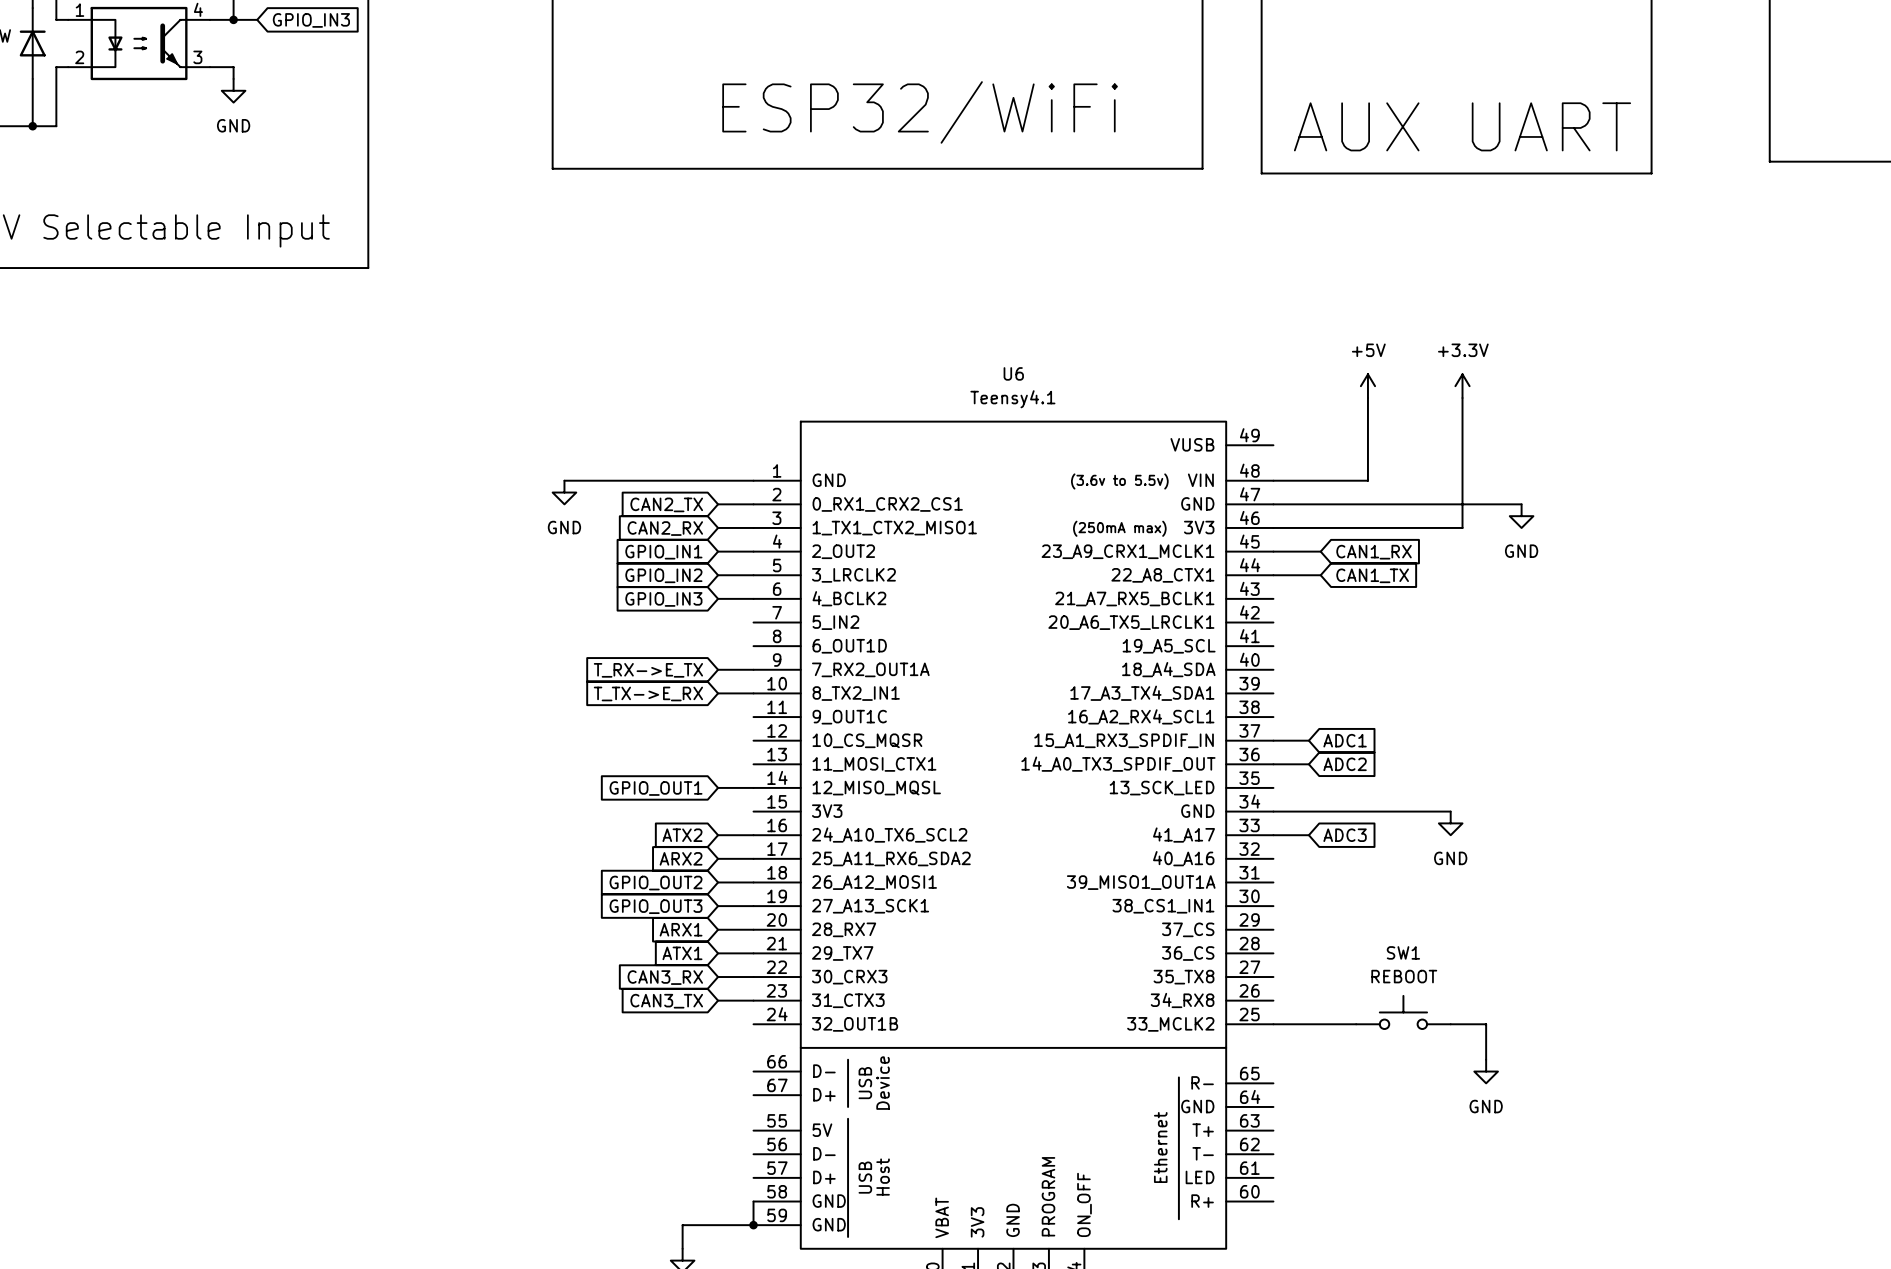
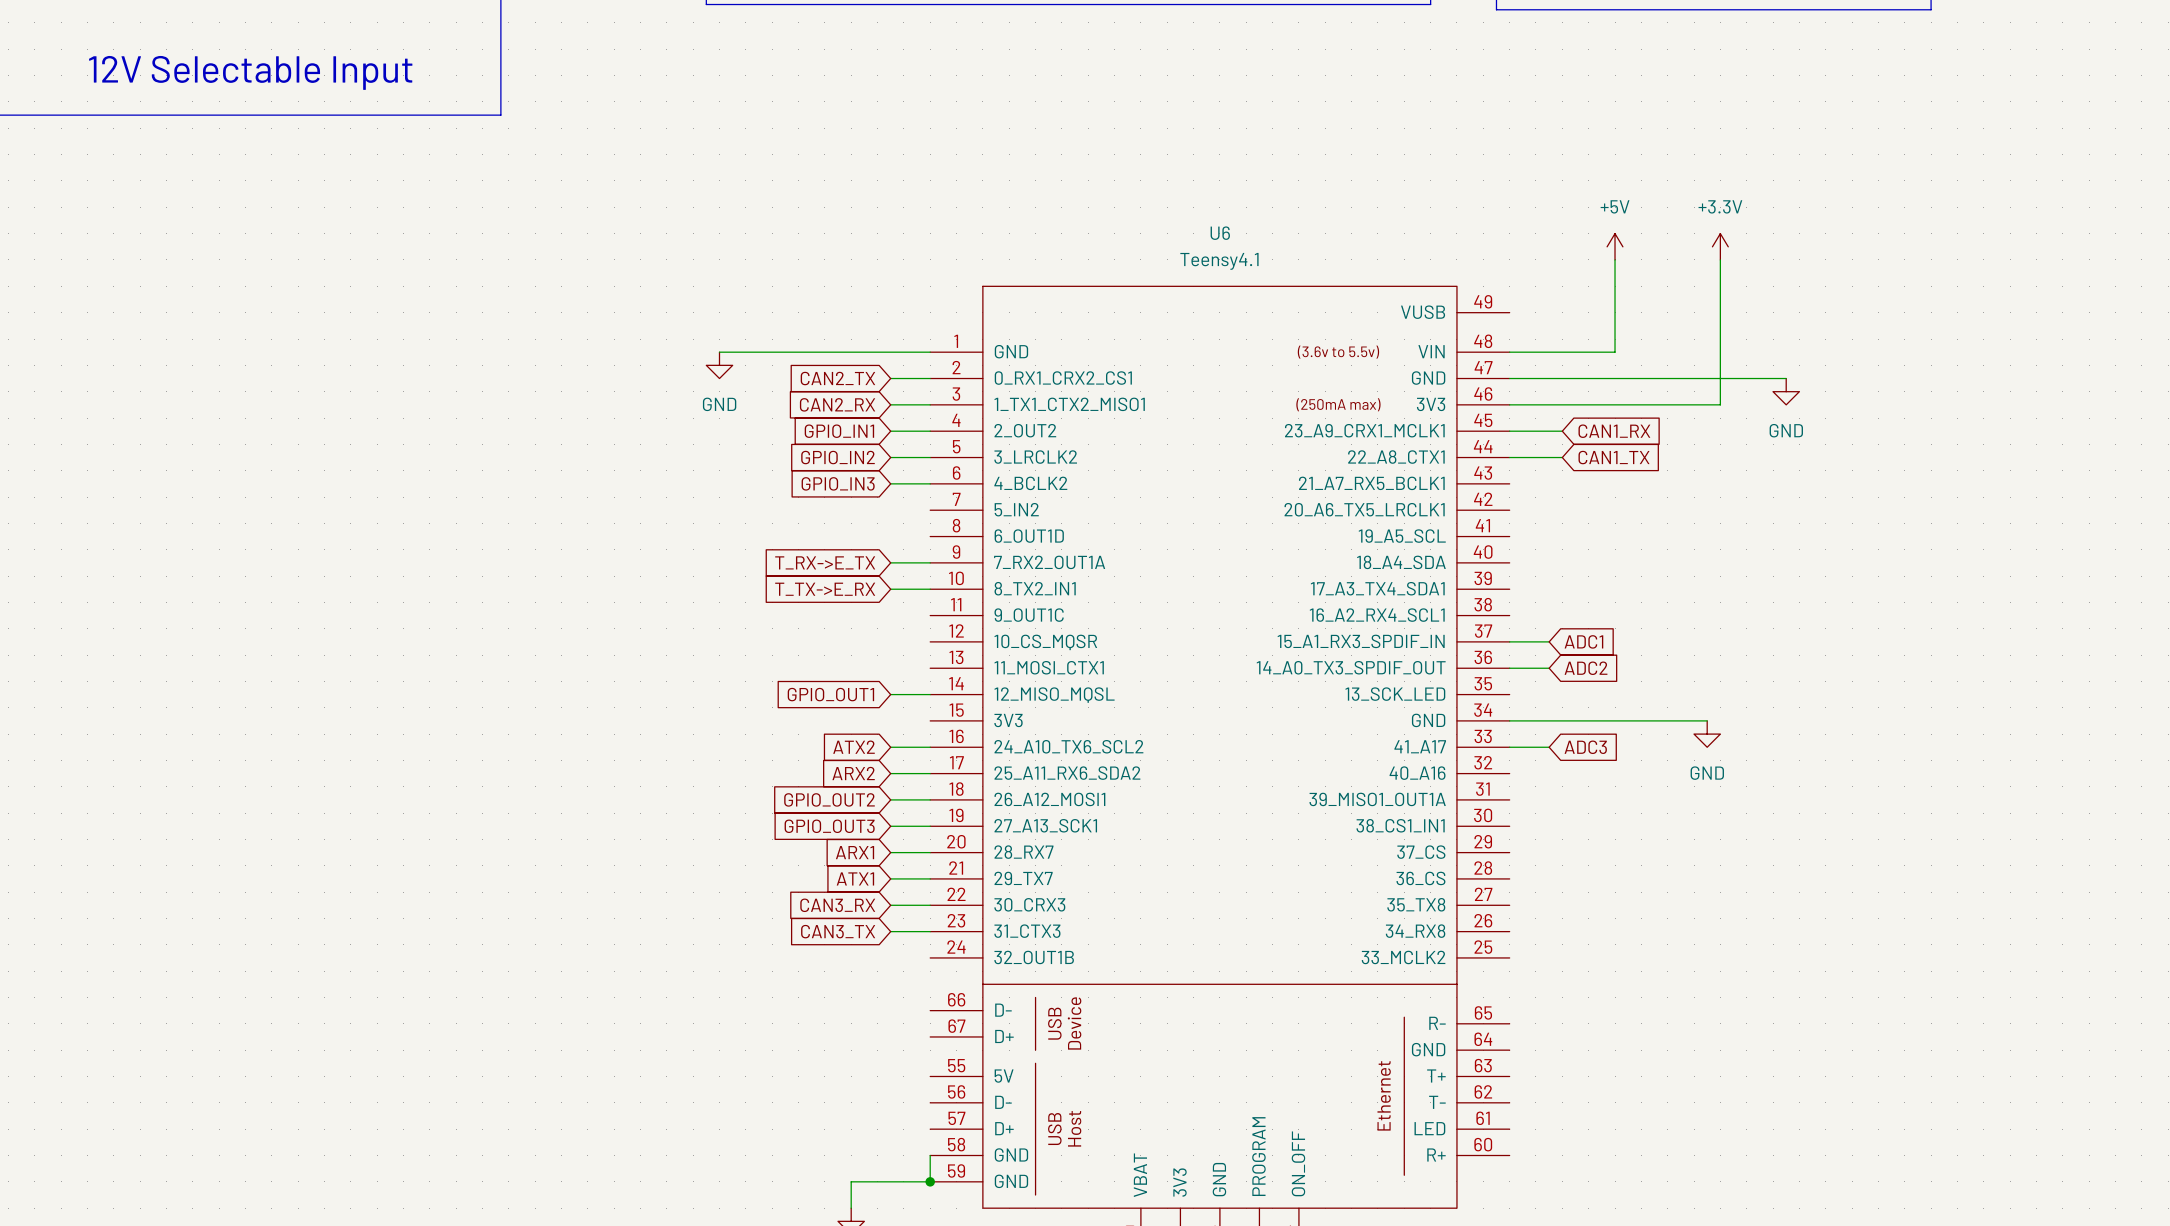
SW1: REBOOT (1403, 1012) -> none
wire: (1273, 1024) (1356, 1024) -> none
wire: (1450, 1024) (1486, 1024) (1486, 1059) -> none
power symbol: GND (1486, 1071) -> none

